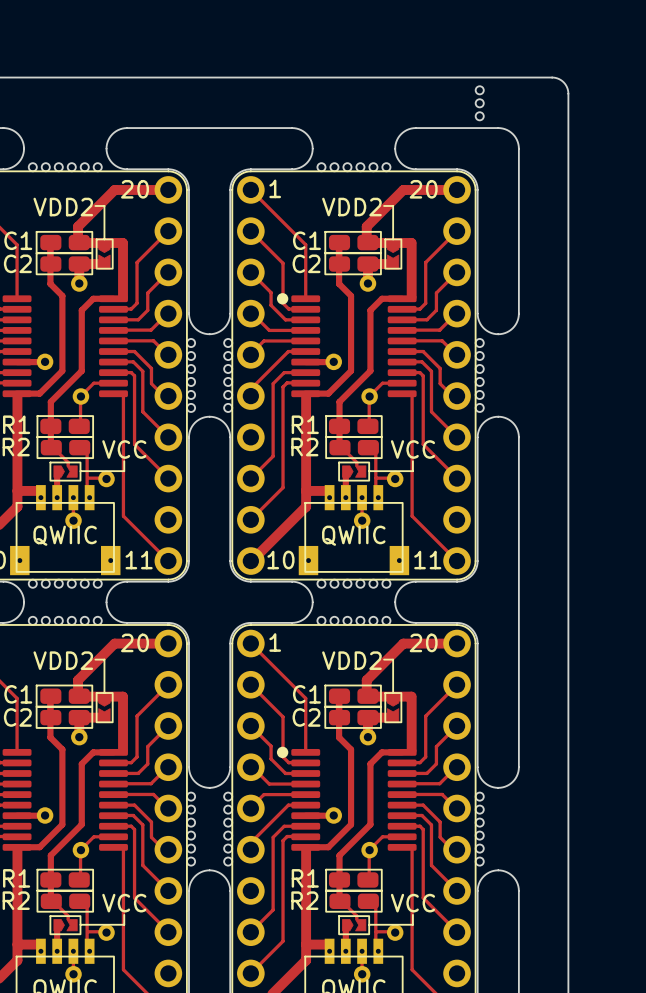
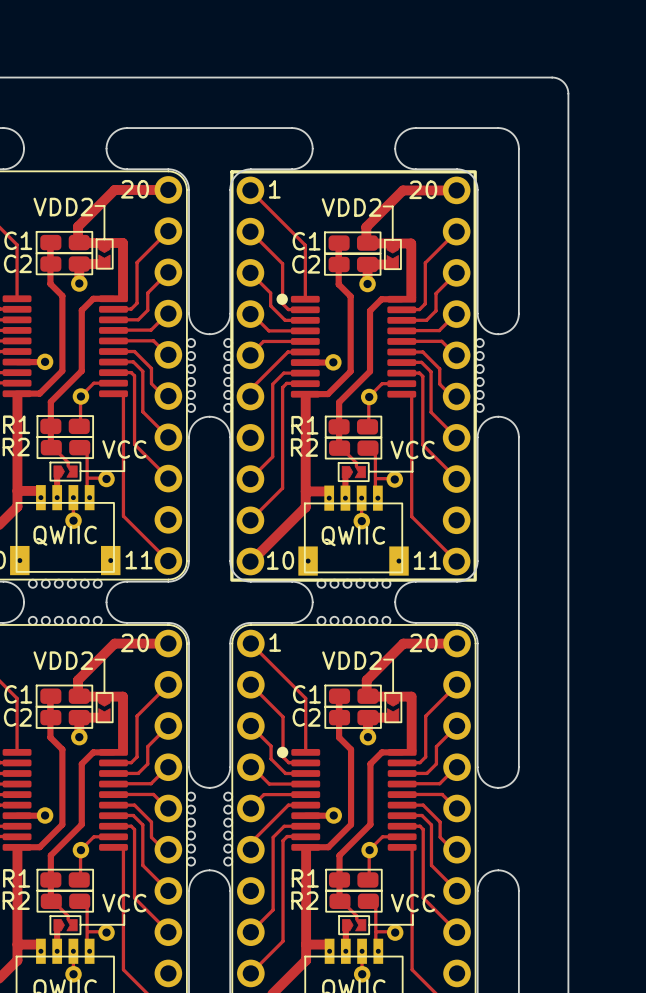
part: (479, 103) -> none
part: (65, 167) -> none
part: (353, 167) -> none
part footprint: [231, 170, 477, 581] -> [230, 170, 477, 582]
part: (479, 829) -> none

